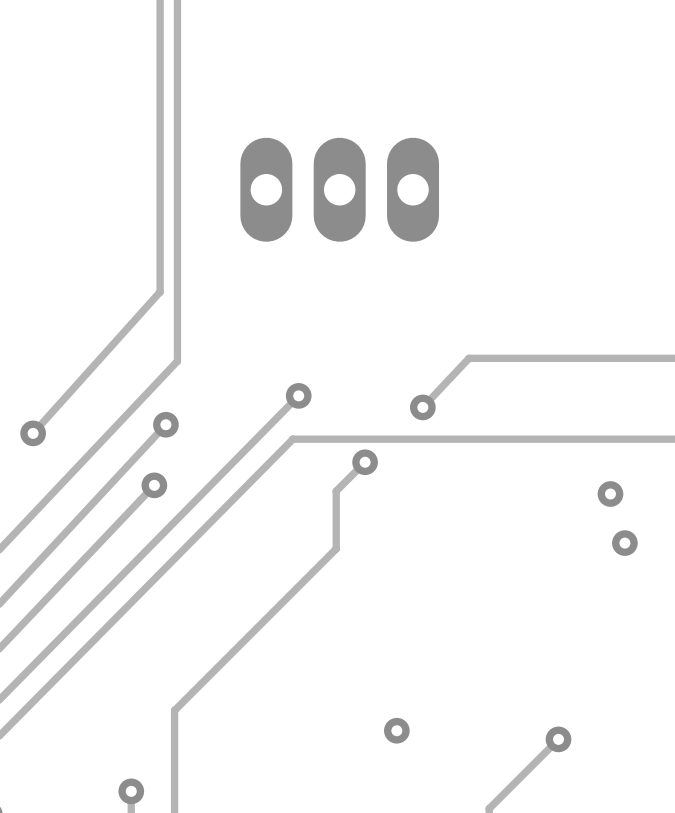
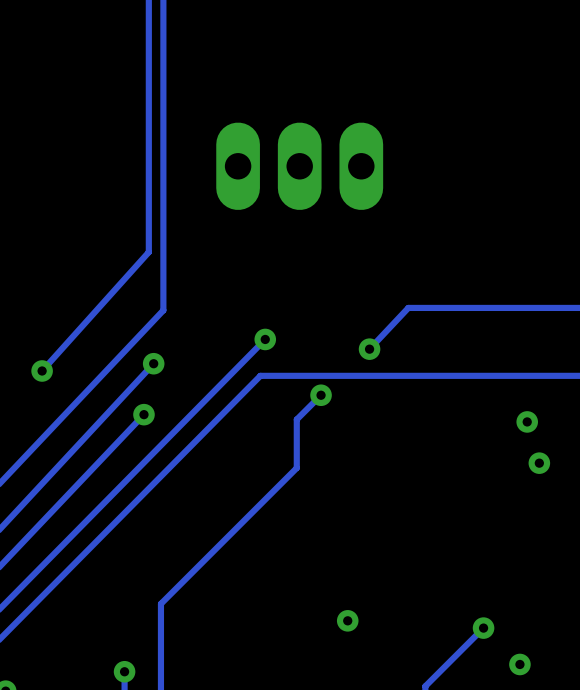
via: none -> (519, 664)

